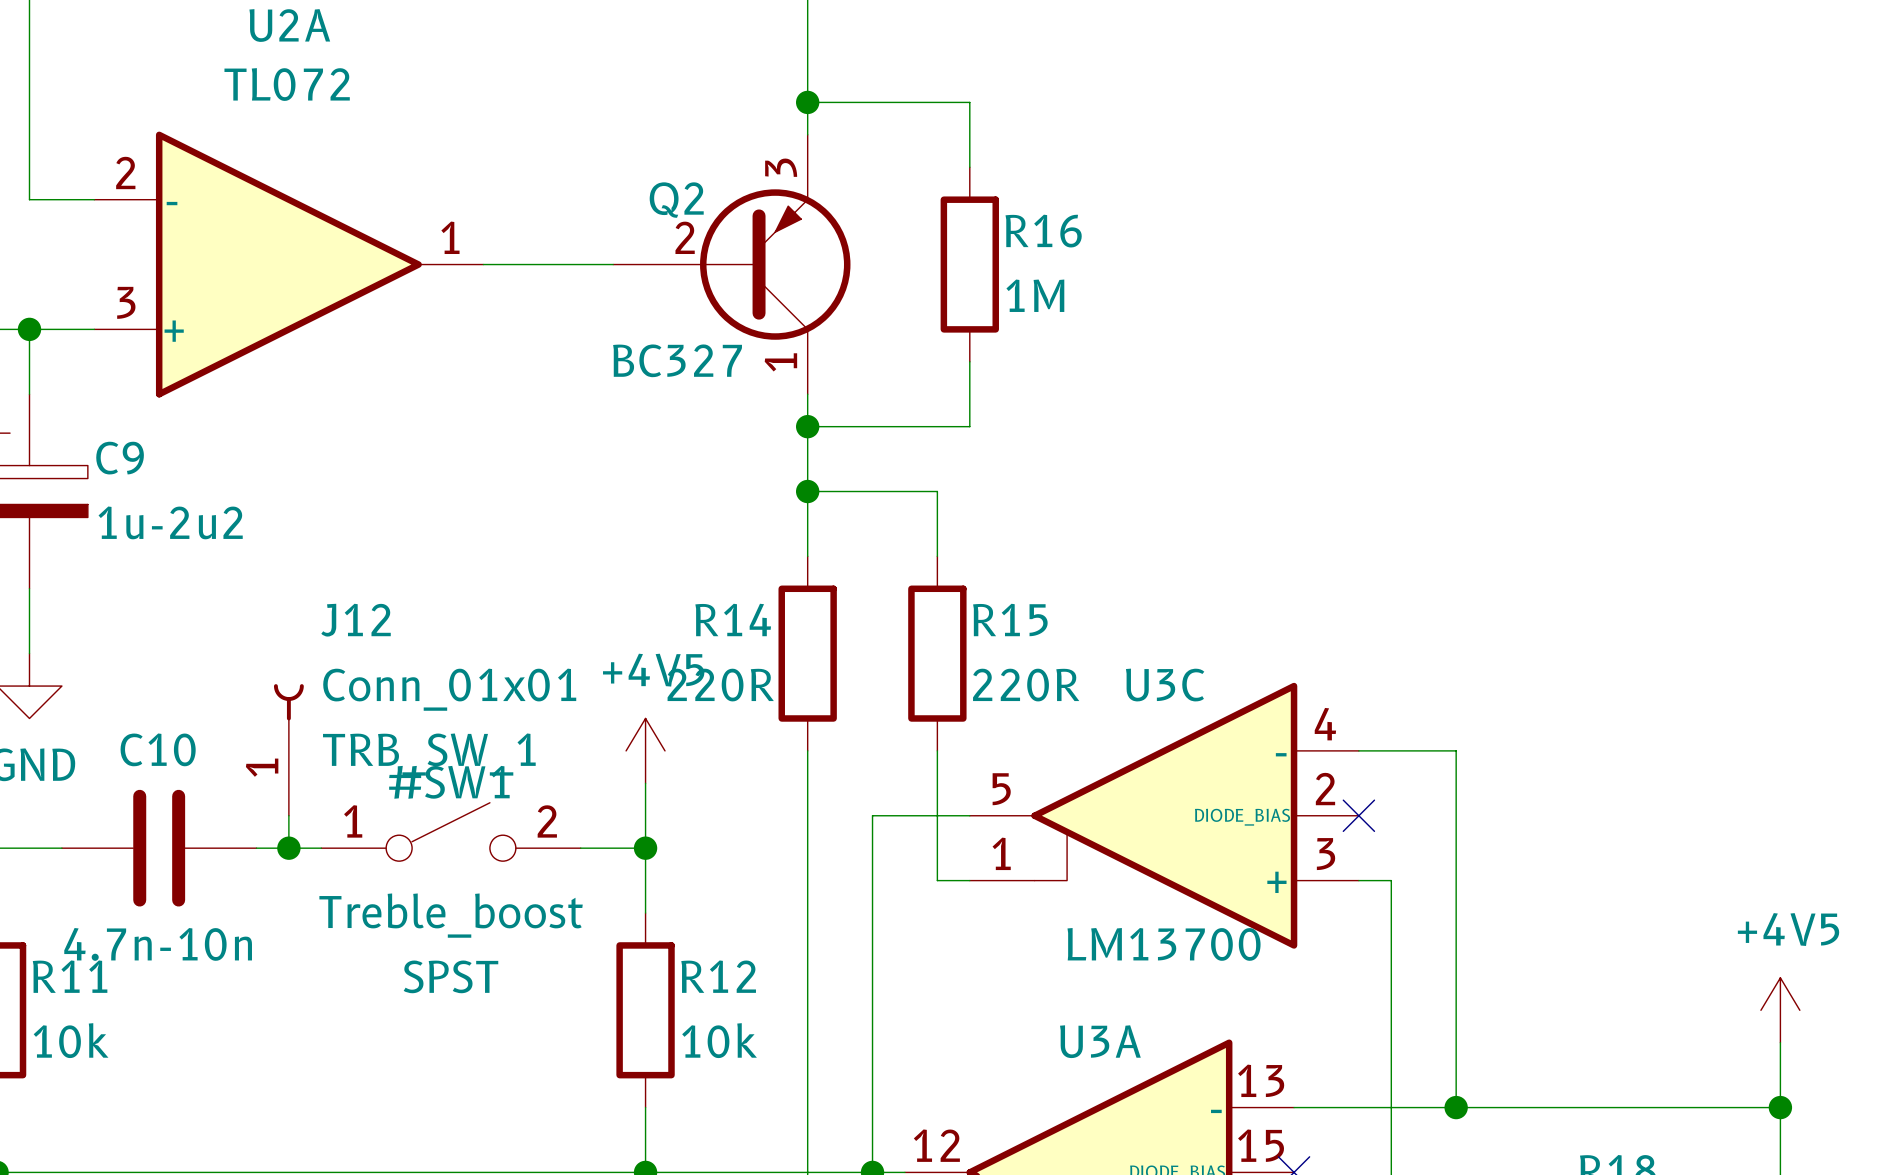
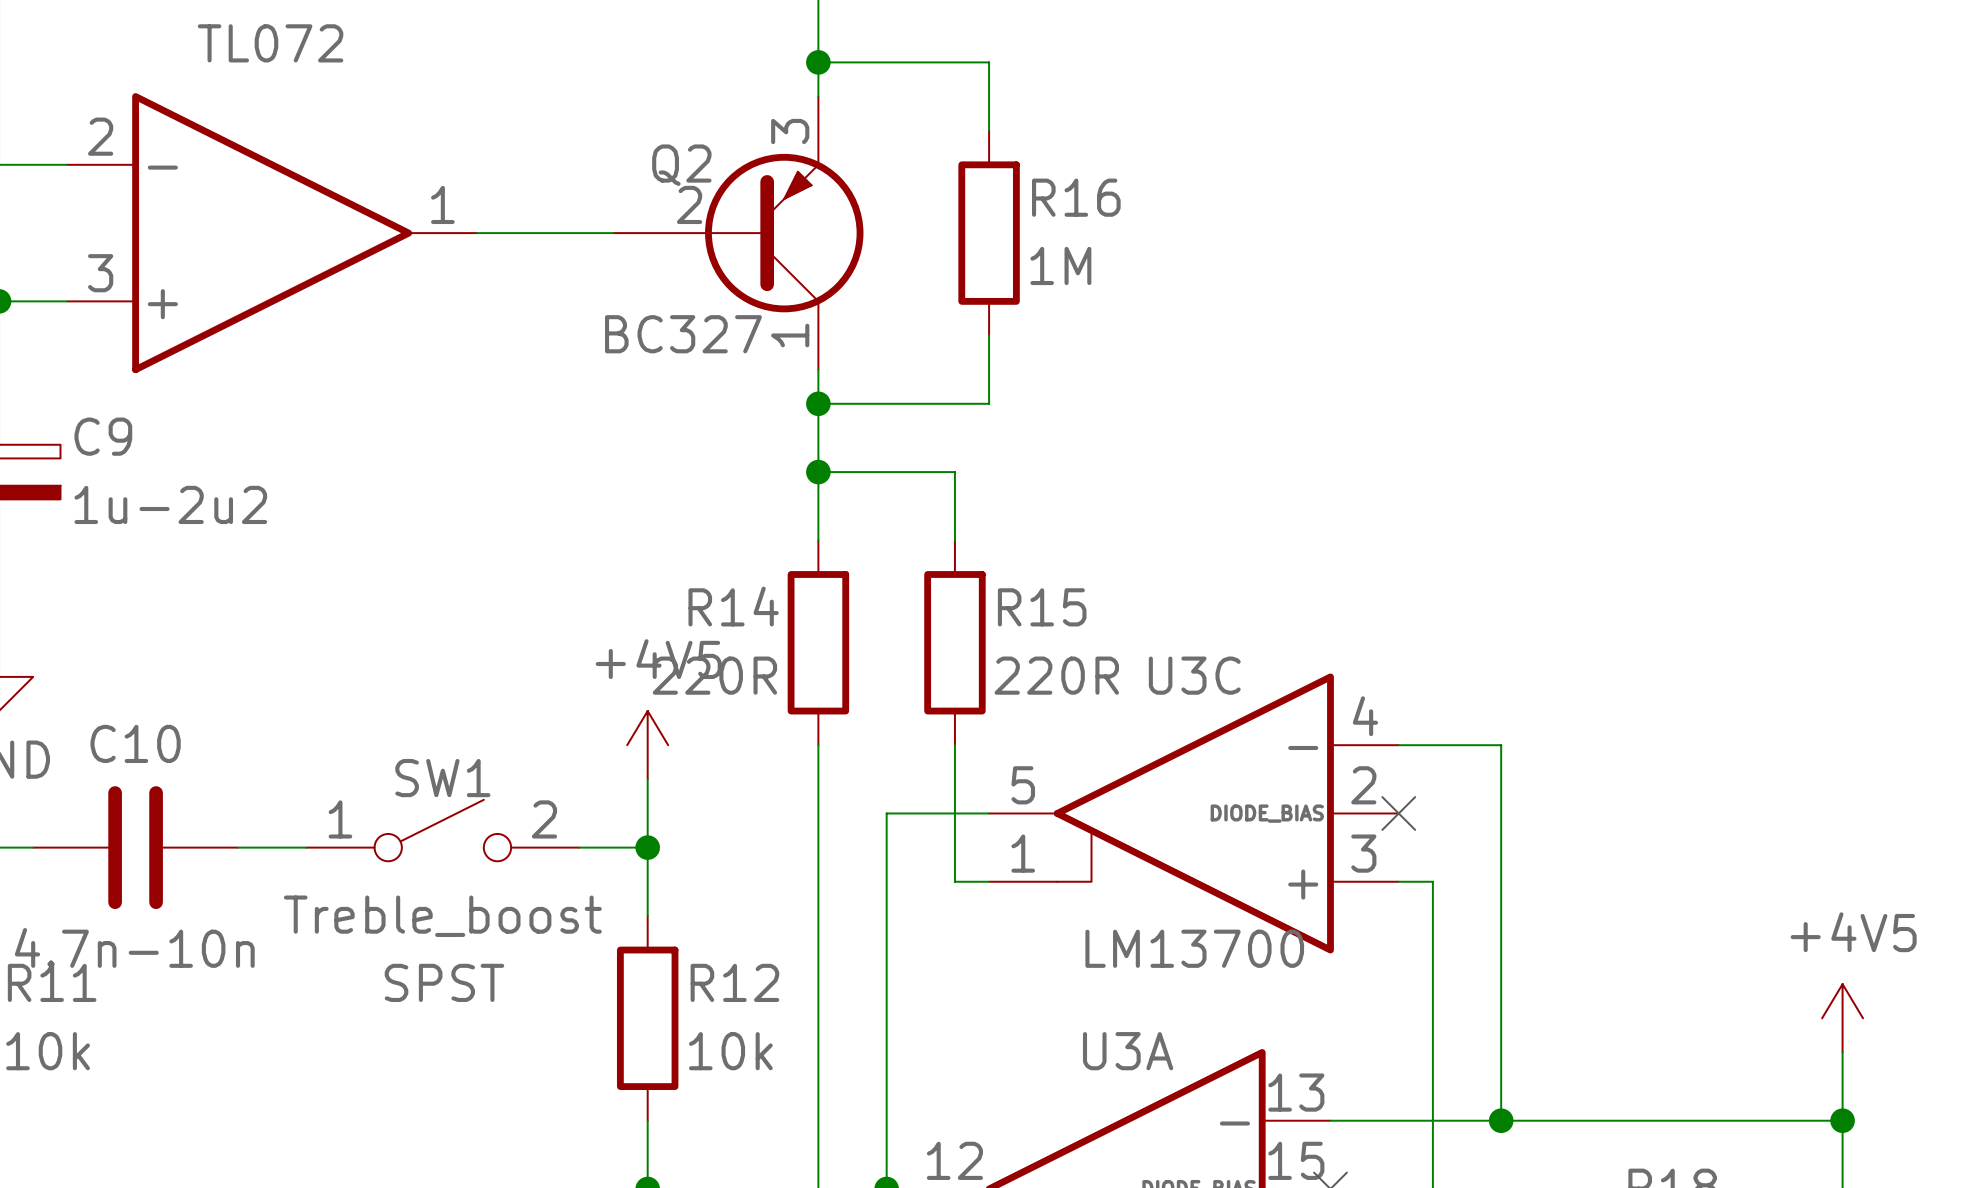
J12: Conn_01x01 (288, 749) -> none
wire: (288, 815) (288, 848) -> none
#SW1: SPST (451, 831) -> none
SW1: none -> SPST (442, 830)
junction: (288, 848) -> none

